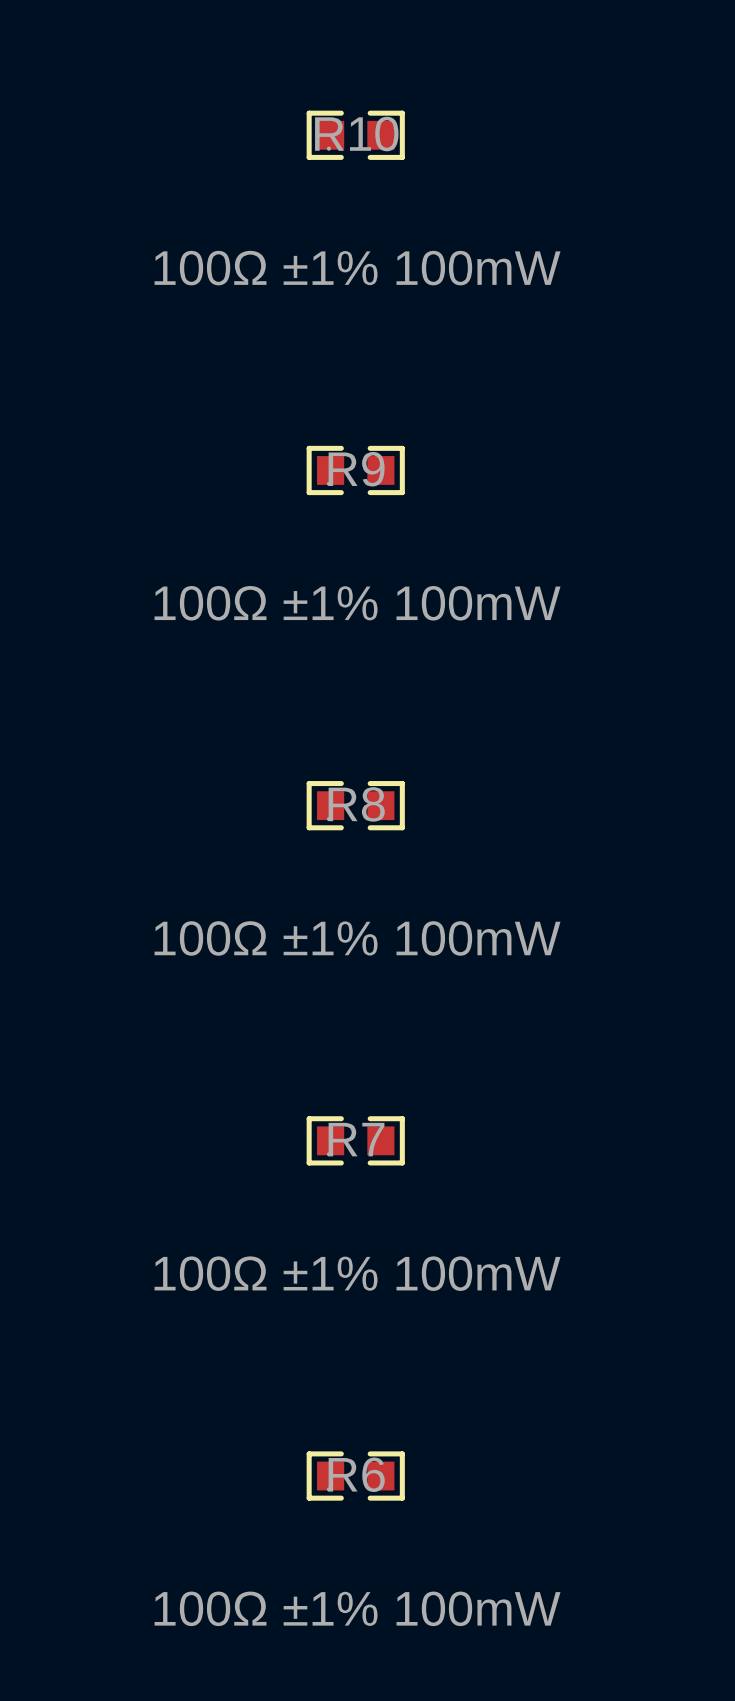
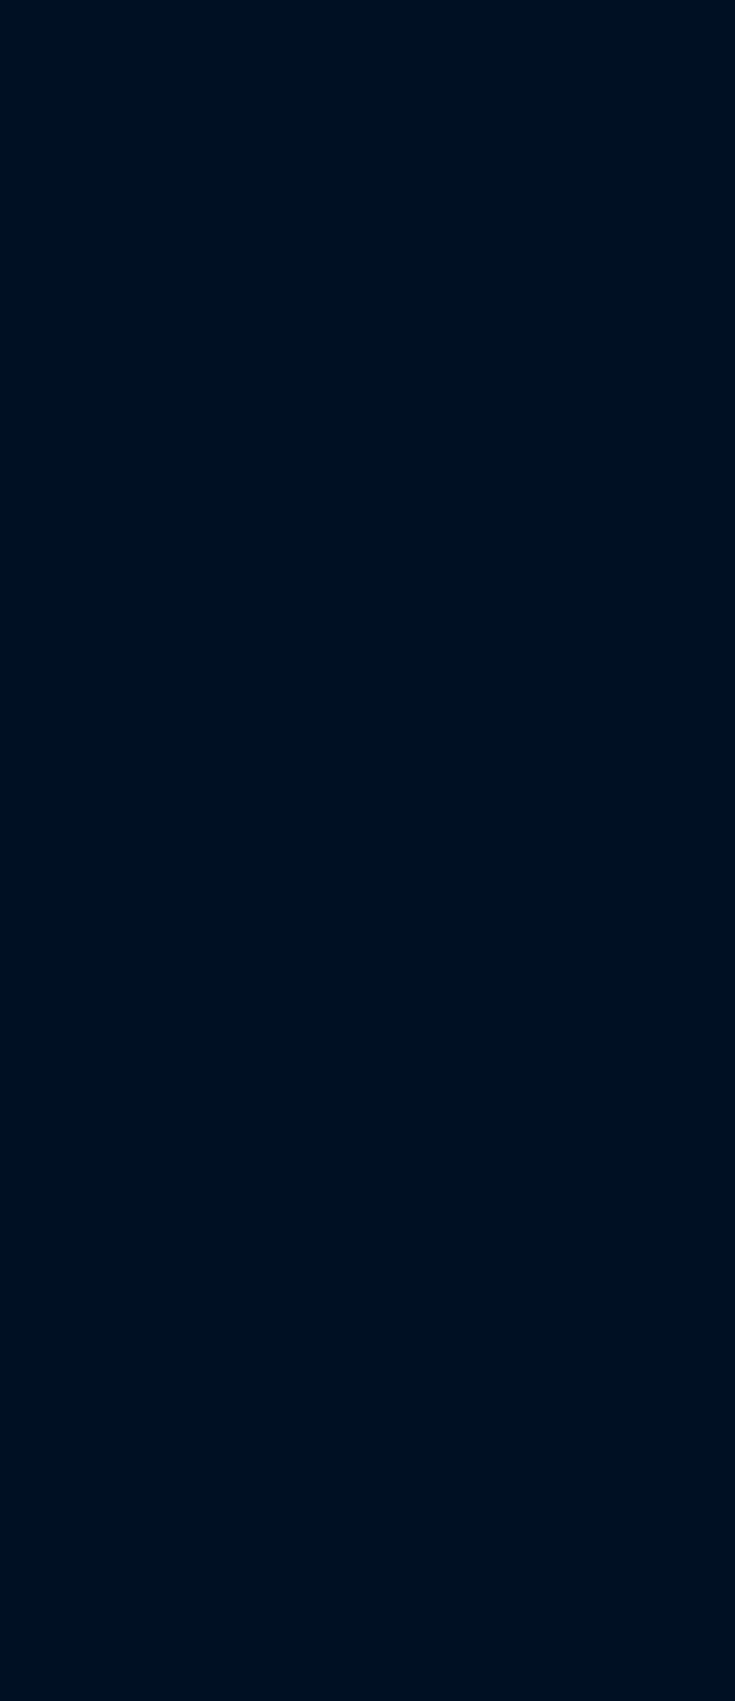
R10: 100Ω ±1% 100mW (355, 135) -> none
R9: 100Ω ±1% 100mW (355, 470) -> none
R8: 100Ω ±1% 100mW (355, 805) -> none
R7: 100Ω ±1% 100mW (355, 1140) -> none
R6: 100Ω ±1% 100mW (355, 1476) -> none

